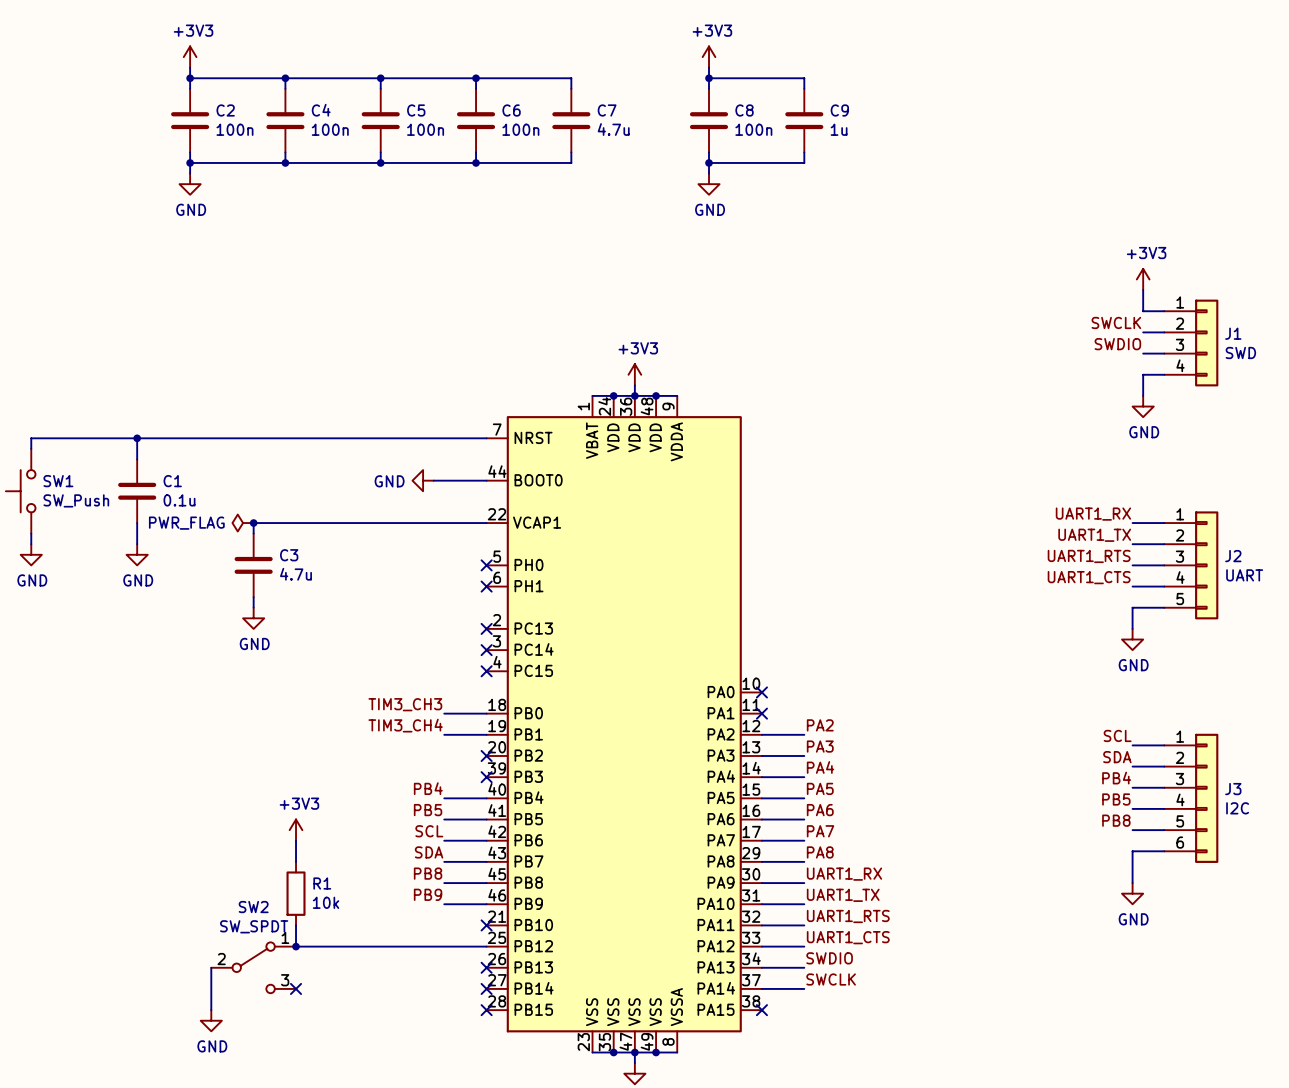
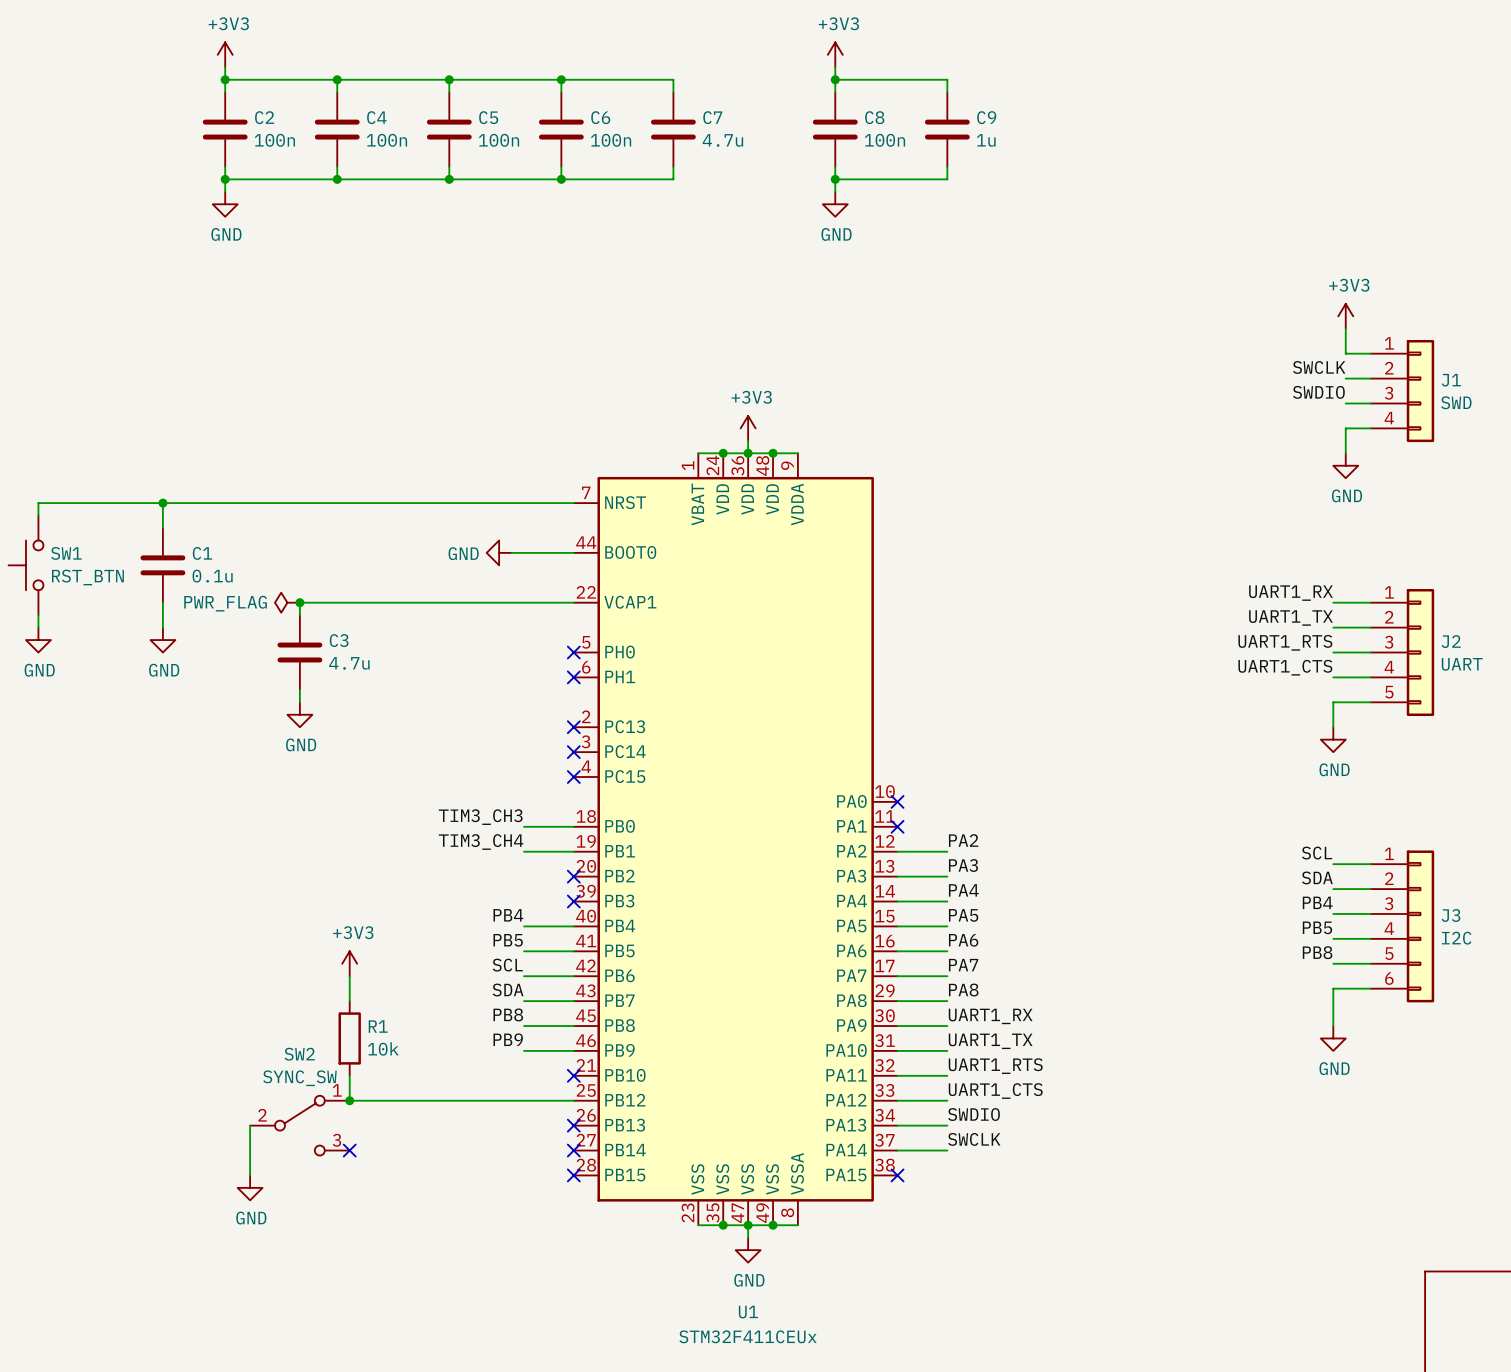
SW1 value: SW_Push (76, 500) -> RST_BTN (87, 577)
SW2 value: SW_SPDT (254, 926) -> SYNC_SW (299, 1078)

